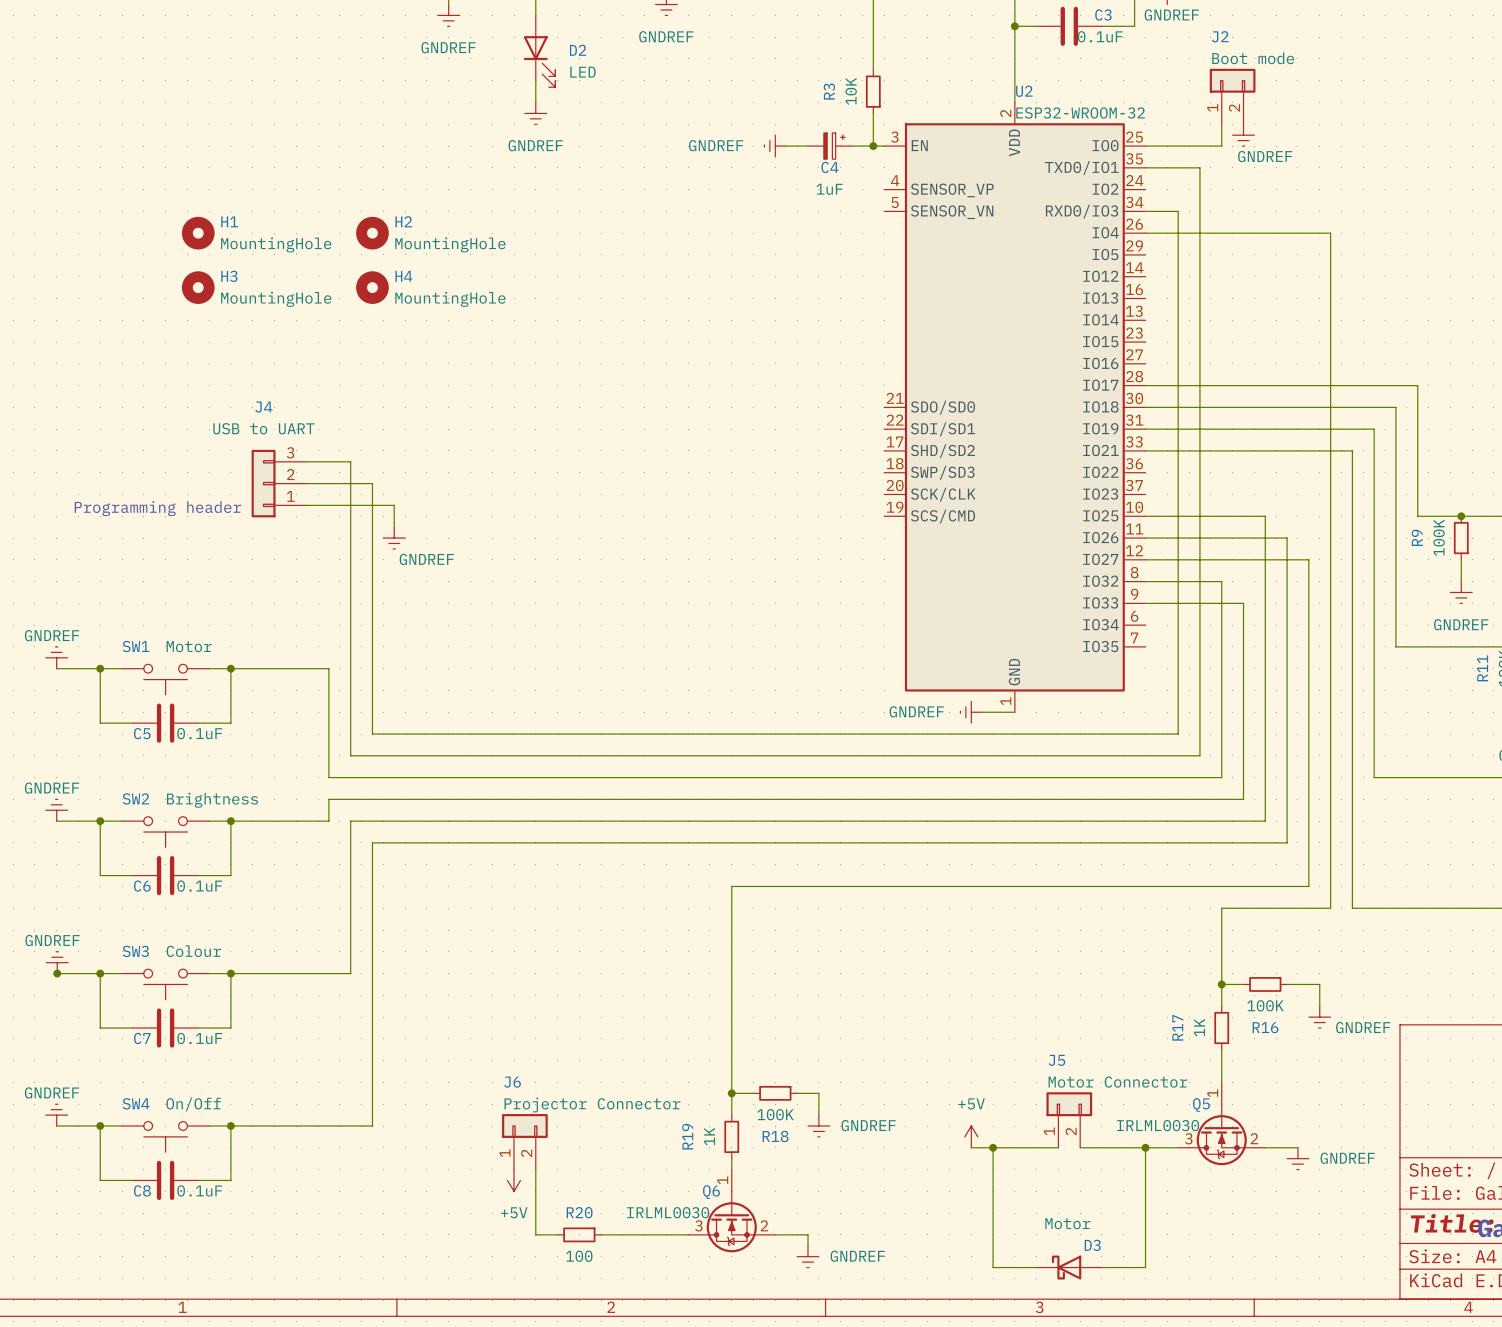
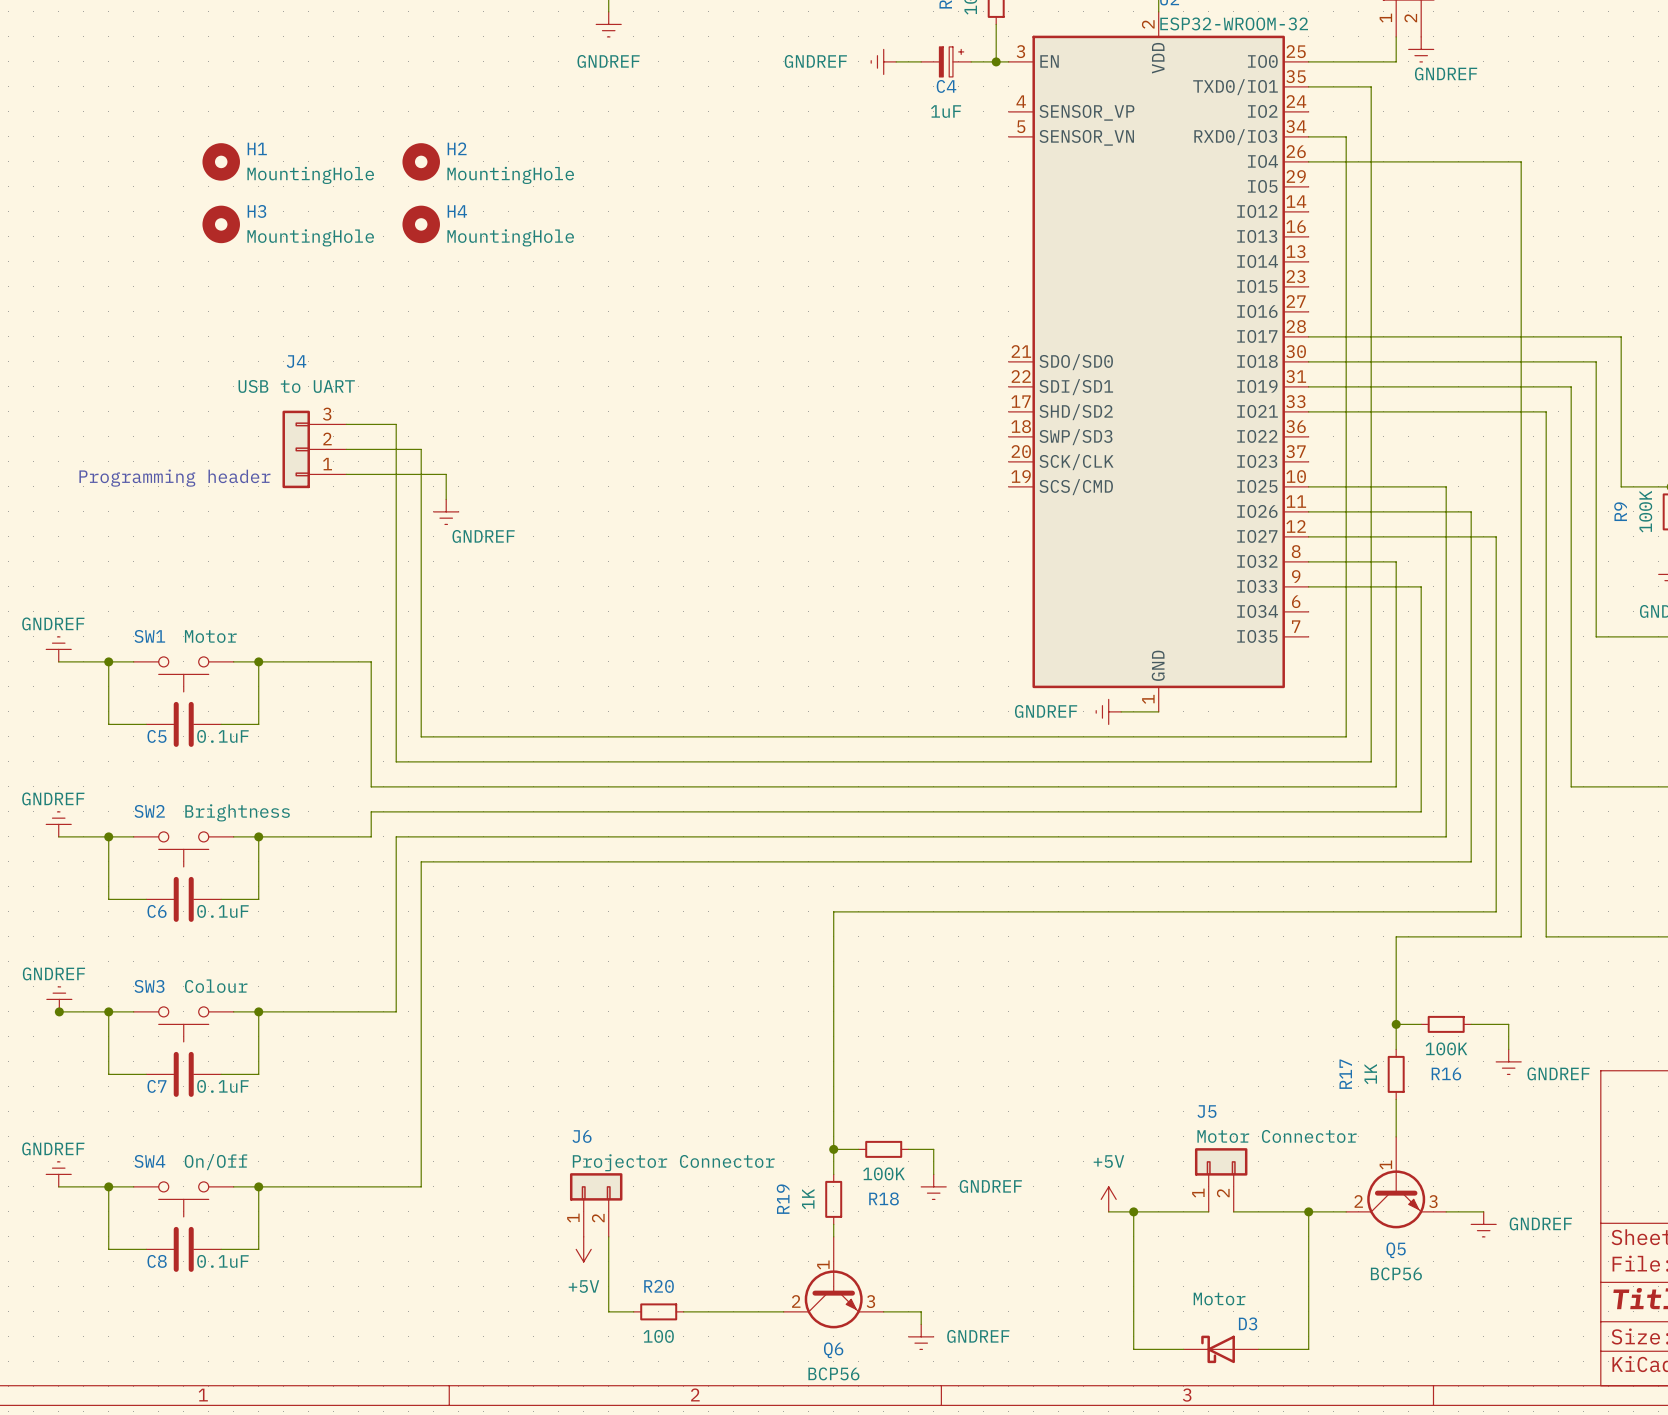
Q5 symbol: [1178, 1082, 1266, 1166] -> [1346, 1136, 1447, 1229]
Q5 name position: Q5 (1201, 1105) -> Q5 (1396, 1250)
Q5 value: IRLML0030 (1158, 1125) -> BCP56 (1396, 1273)
Q6 symbol: [688, 1169, 776, 1253] -> [783, 1236, 884, 1329]
Q6 name position: Q6 (711, 1192) -> Q6 (833, 1350)
Q6 value: IRLML0030 (668, 1212) -> BCP56 (833, 1373)

